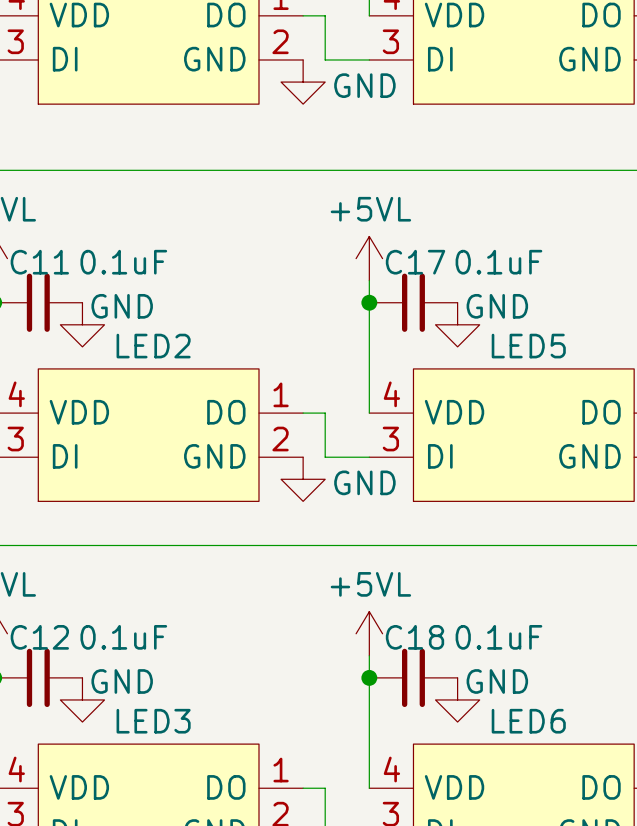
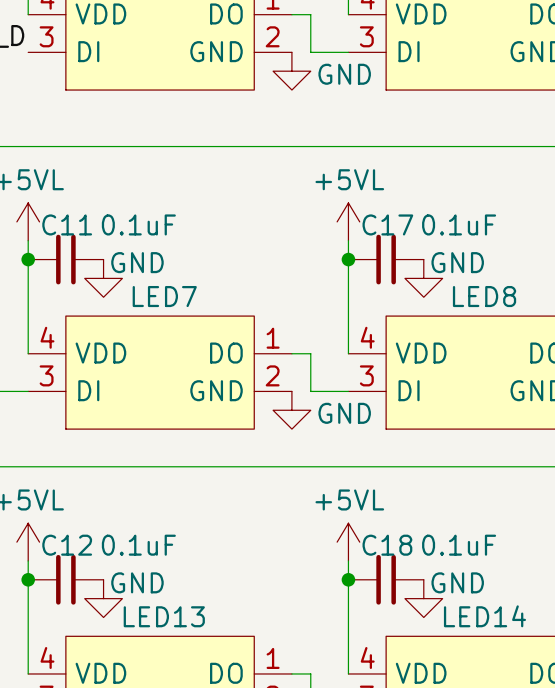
LED2 name: LED2 (153, 346) -> LED7 (164, 296)
LED5 name: LED5 (528, 346) -> LED8 (484, 296)
LED3 name: LED3 (153, 721) -> LED13 (164, 616)
LED6 name: LED6 (528, 721) -> LED14 (484, 616)

